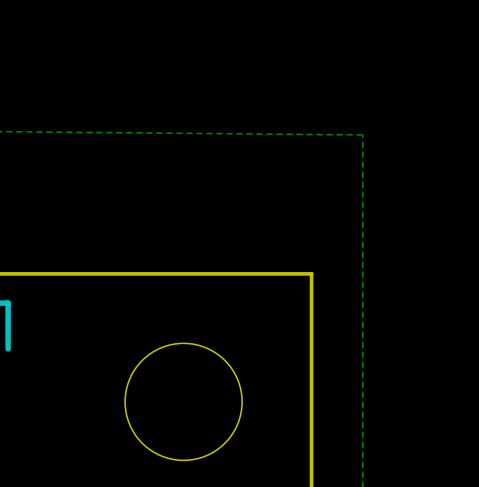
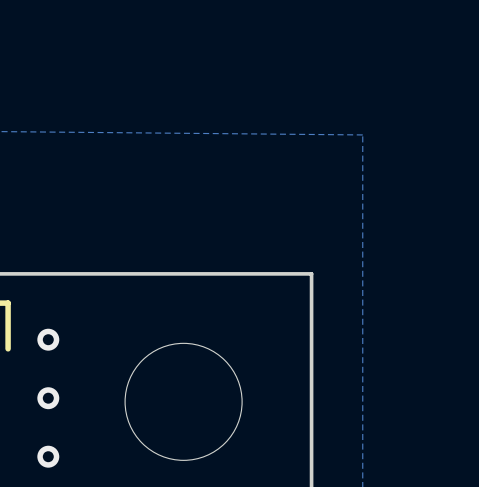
via: none -> (48, 339)
via: none -> (48, 398)
via: none -> (48, 456)

